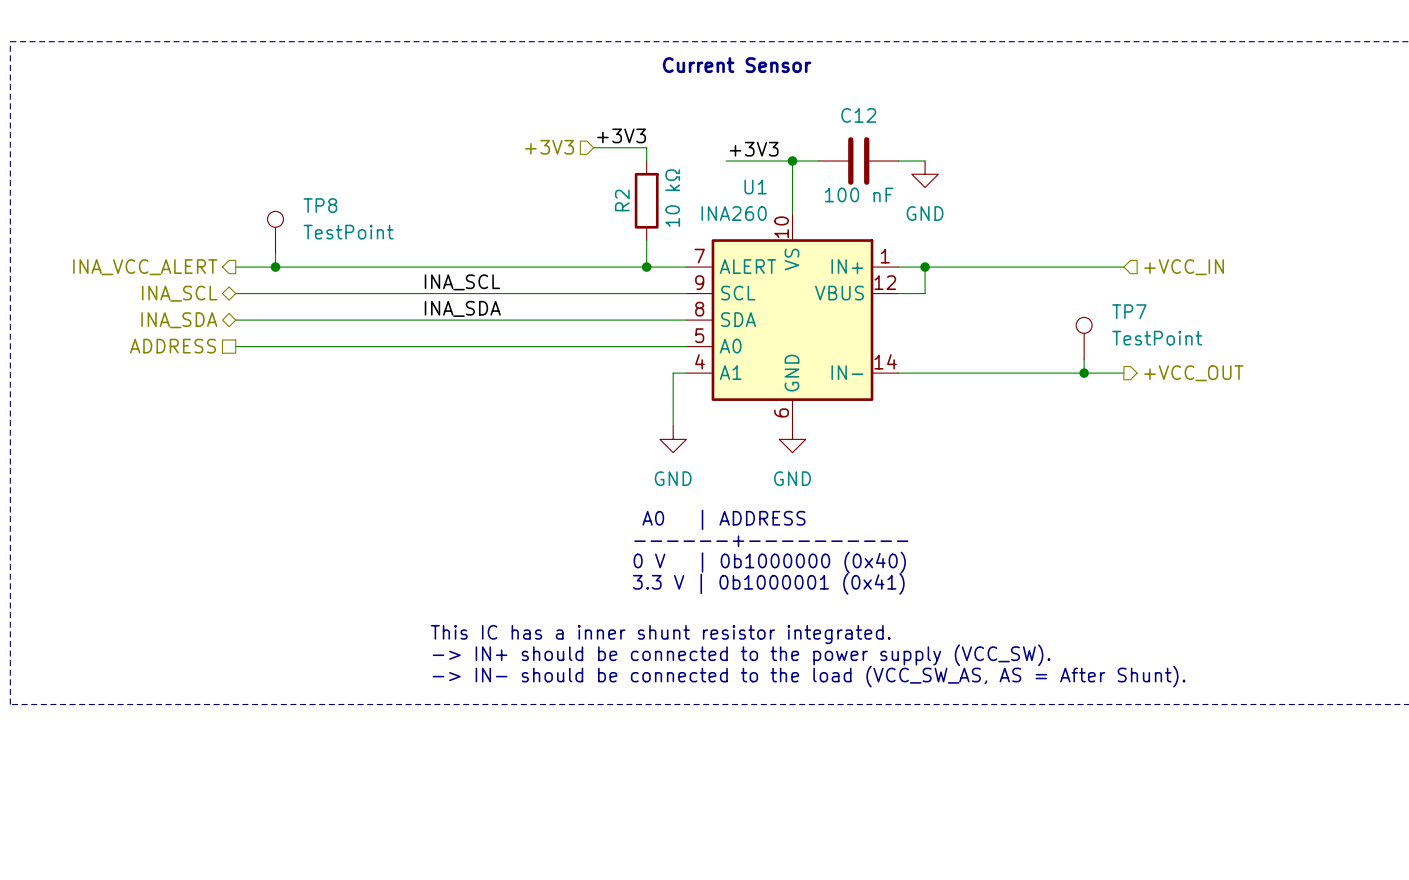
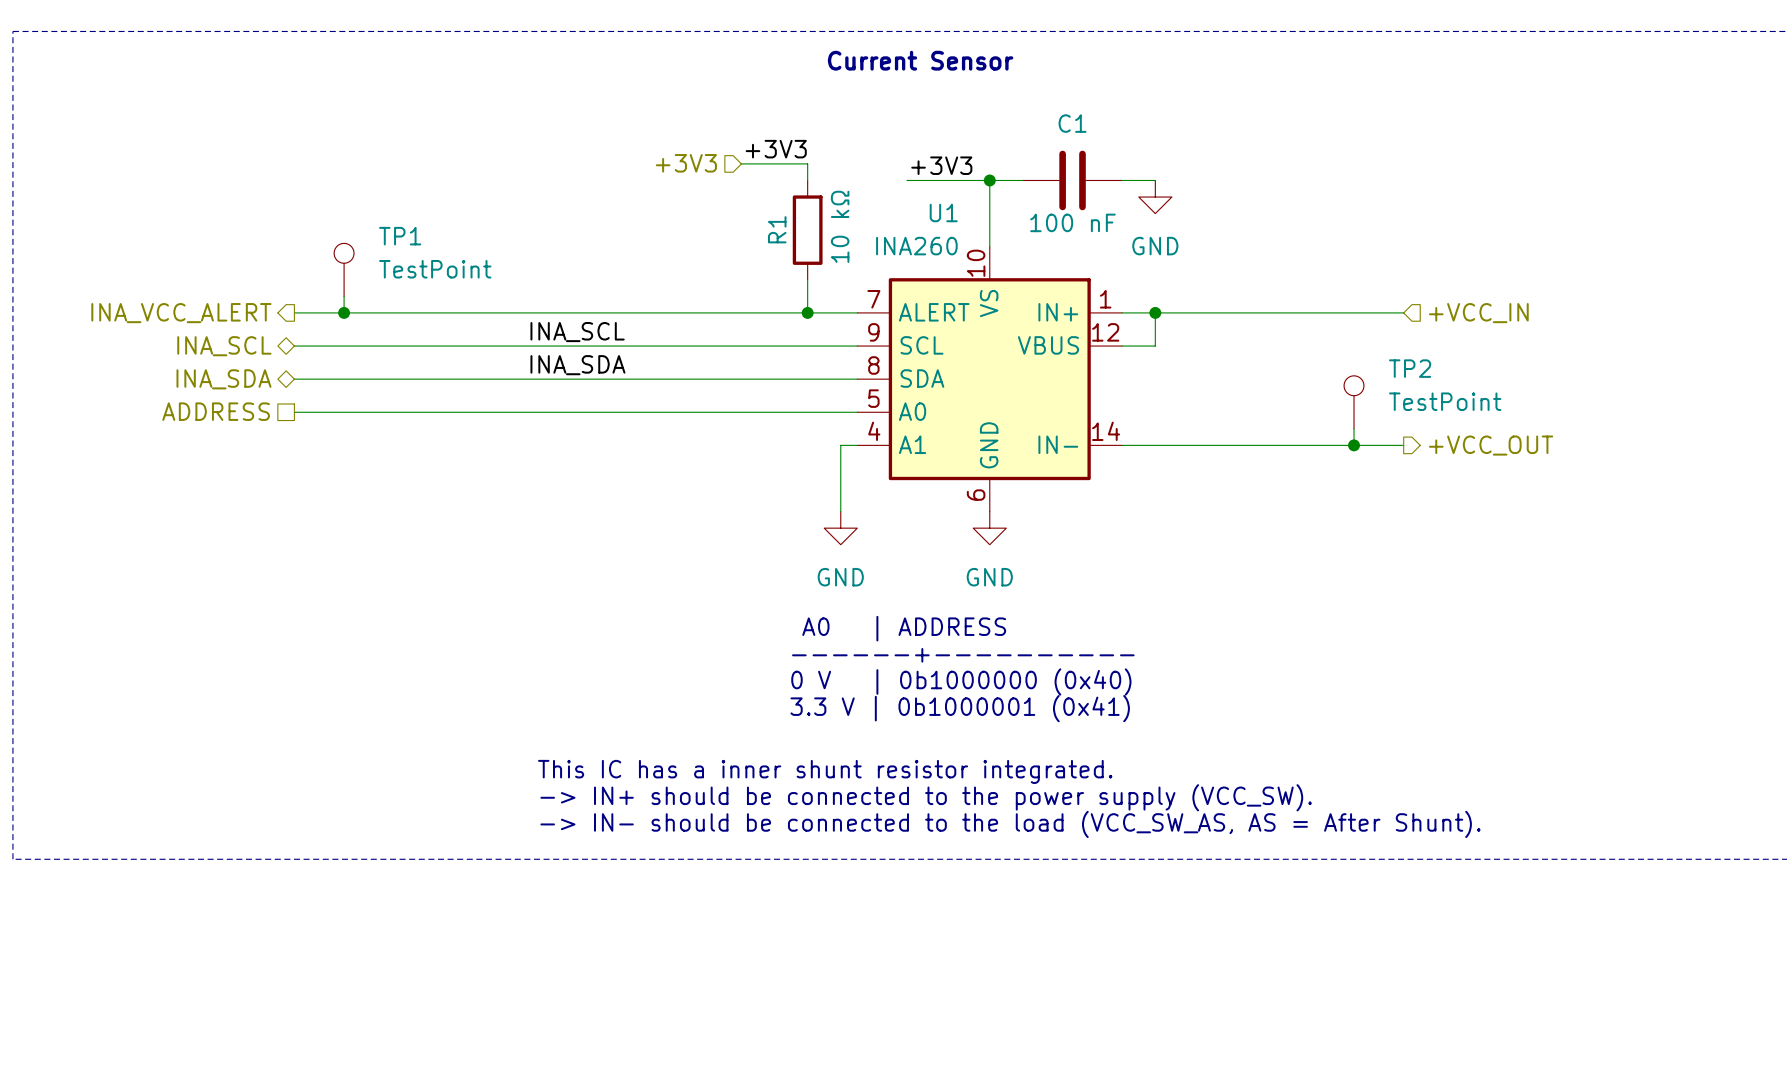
C12 name: C12 (858, 115) -> C1 (1072, 123)
R2 name: R2 (622, 200) -> R1 (777, 229)
TP8 name: TP8 (320, 205) -> TP1 (400, 236)
TP7 name: TP7 (1129, 311) -> TP2 (1410, 368)

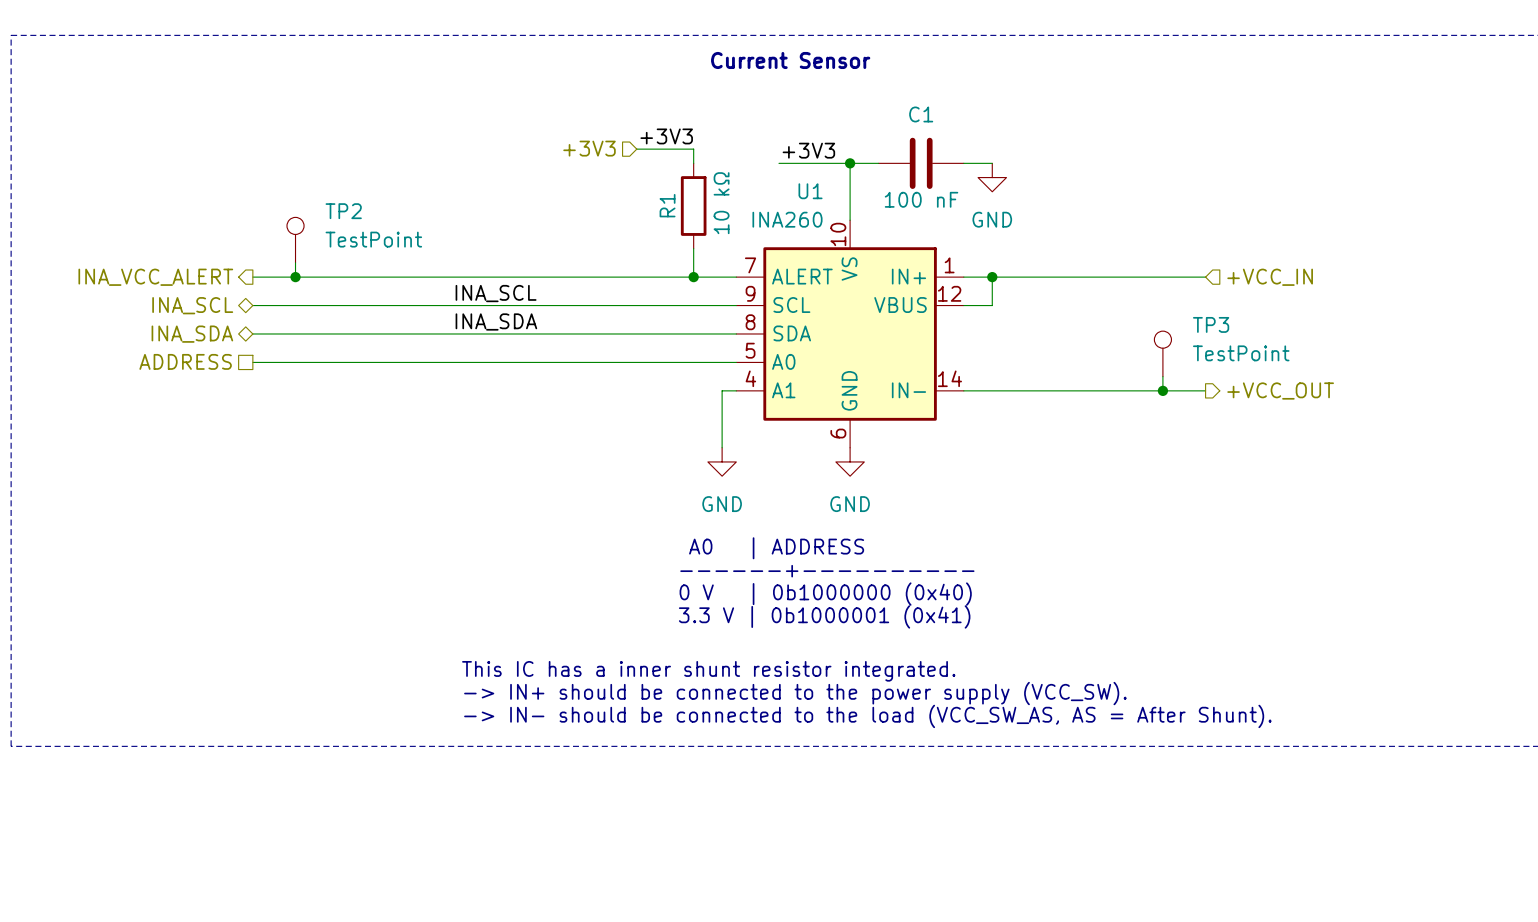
TP1 name: TP1 (400, 236) -> TP2 (343, 211)
TP2 name: TP2 (1410, 368) -> TP3 (1211, 324)

